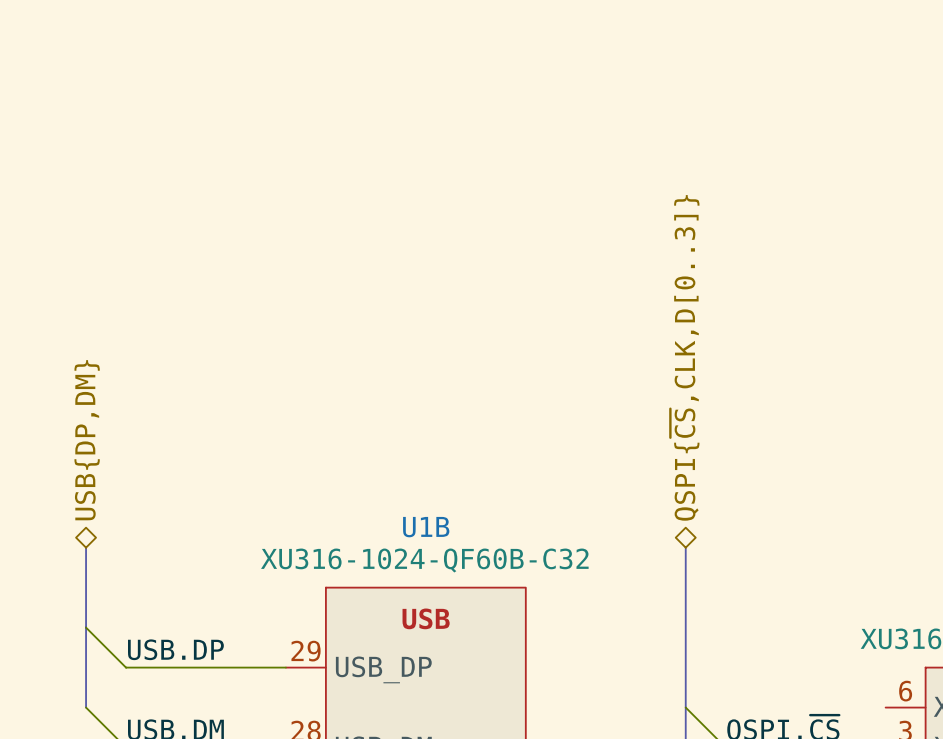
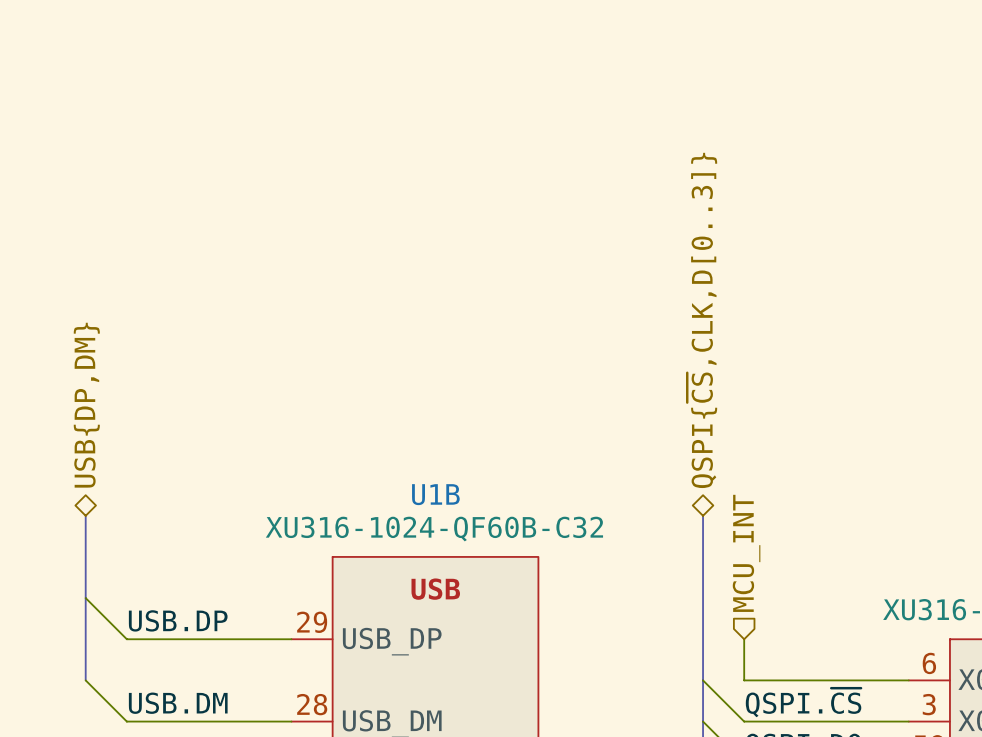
hierarchical label: none -> MCU_INT (746, 553)
wire: none -> (744, 639) (744, 680) (908, 680)

